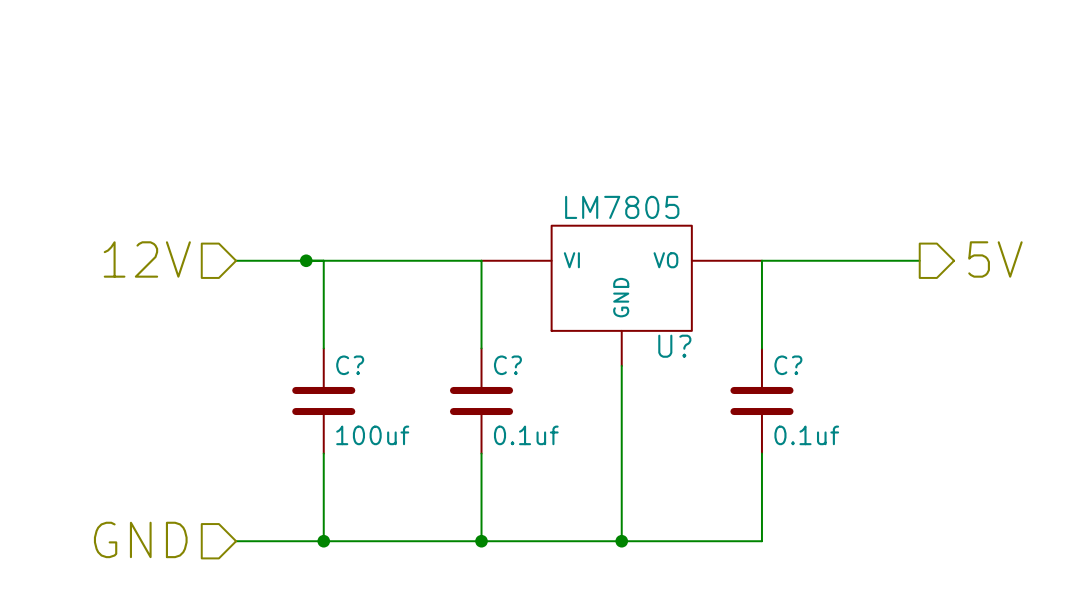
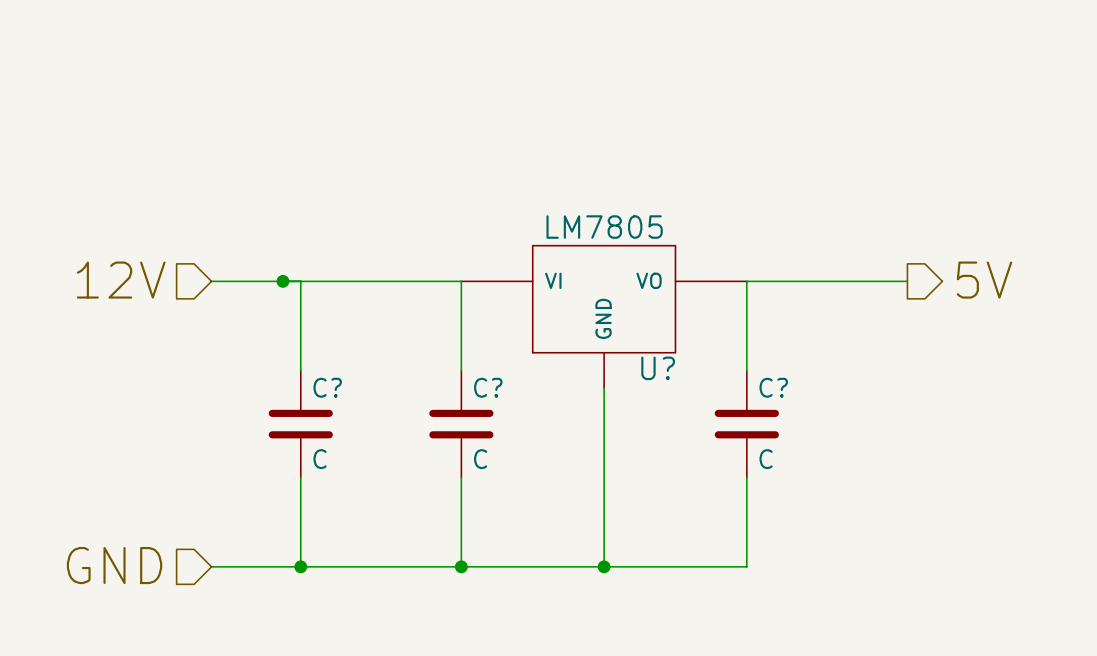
C? value: 100uf (372, 435) -> C (320, 459)
C? value: 0.1uf (526, 435) -> C (480, 459)
C? value: 0.1uf (806, 435) -> C (766, 459)

